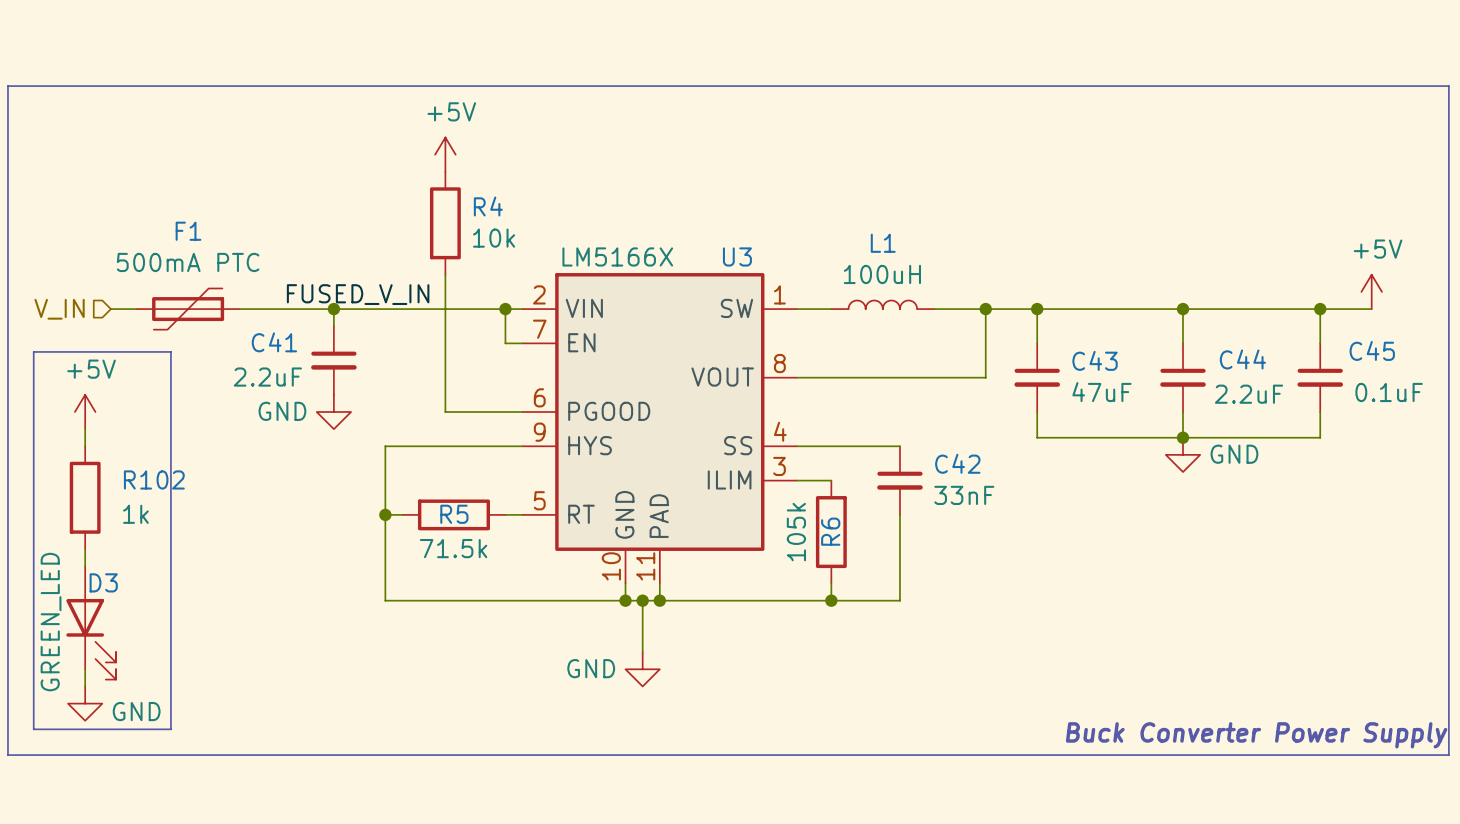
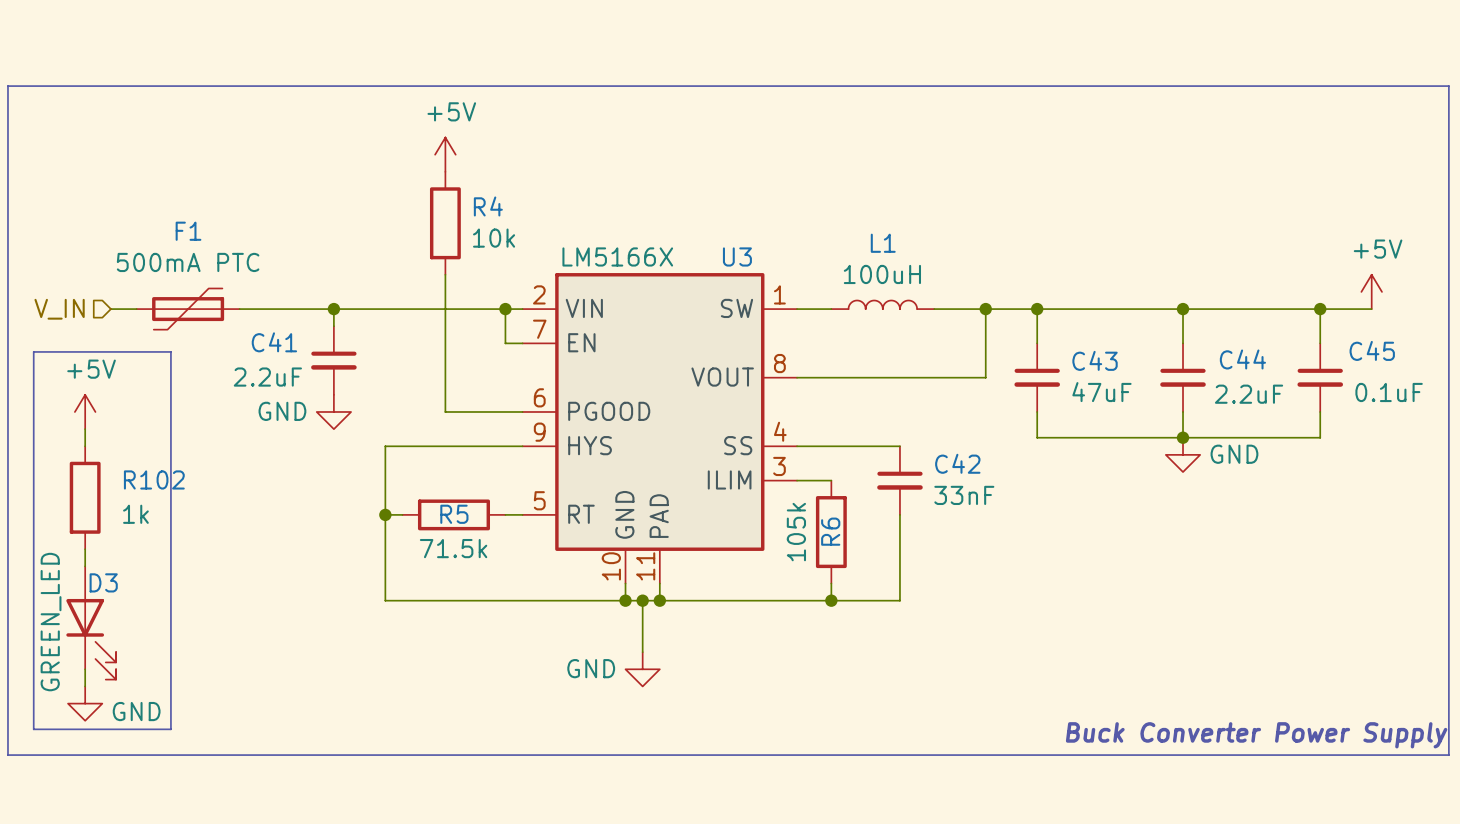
label: FUSED_V_IN (358, 294) -> none

